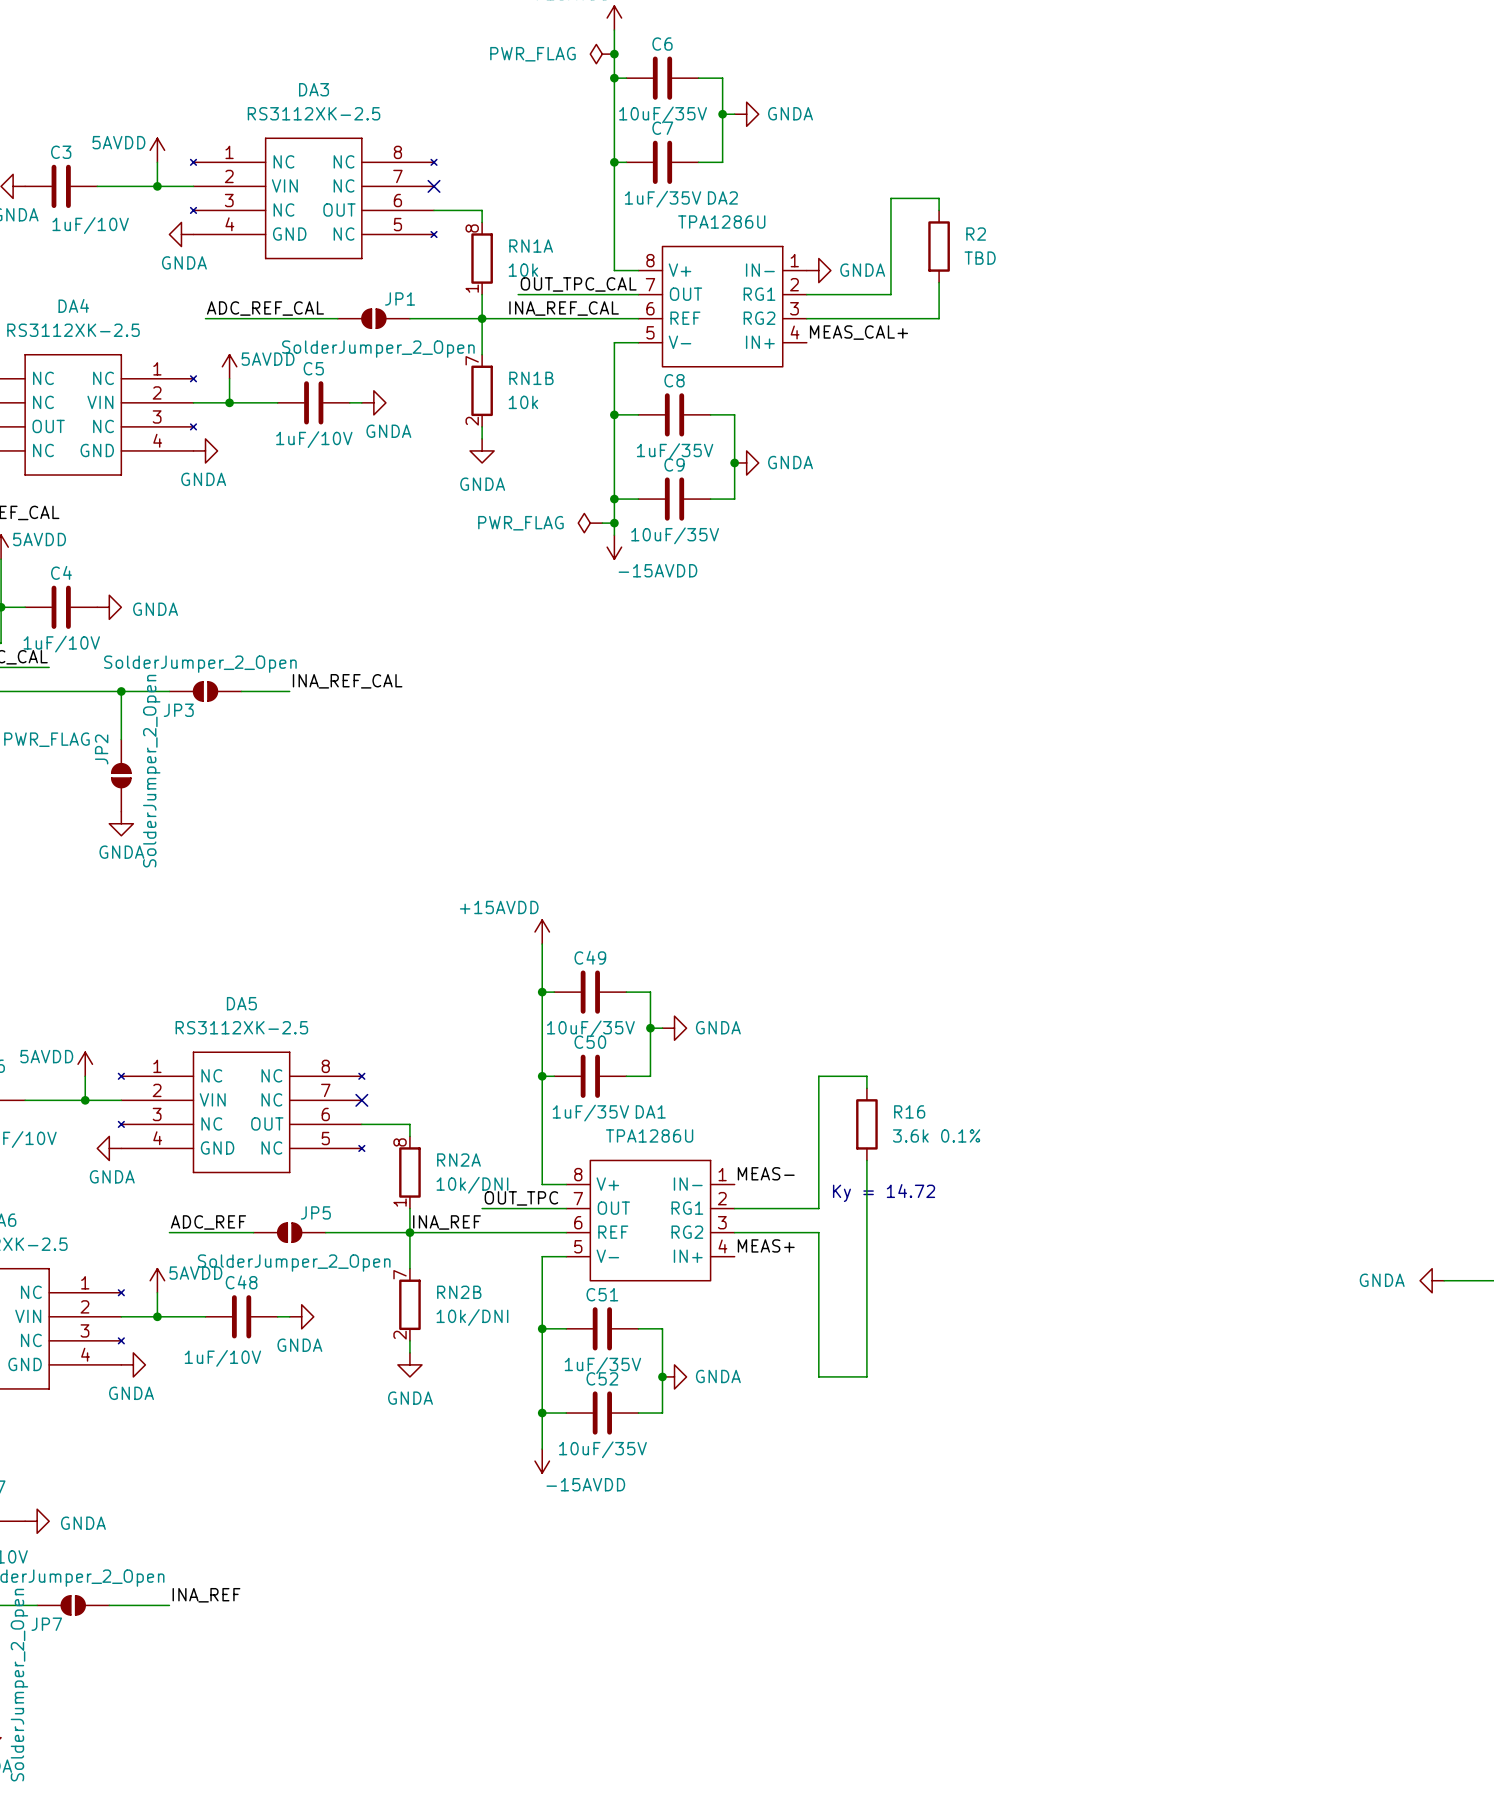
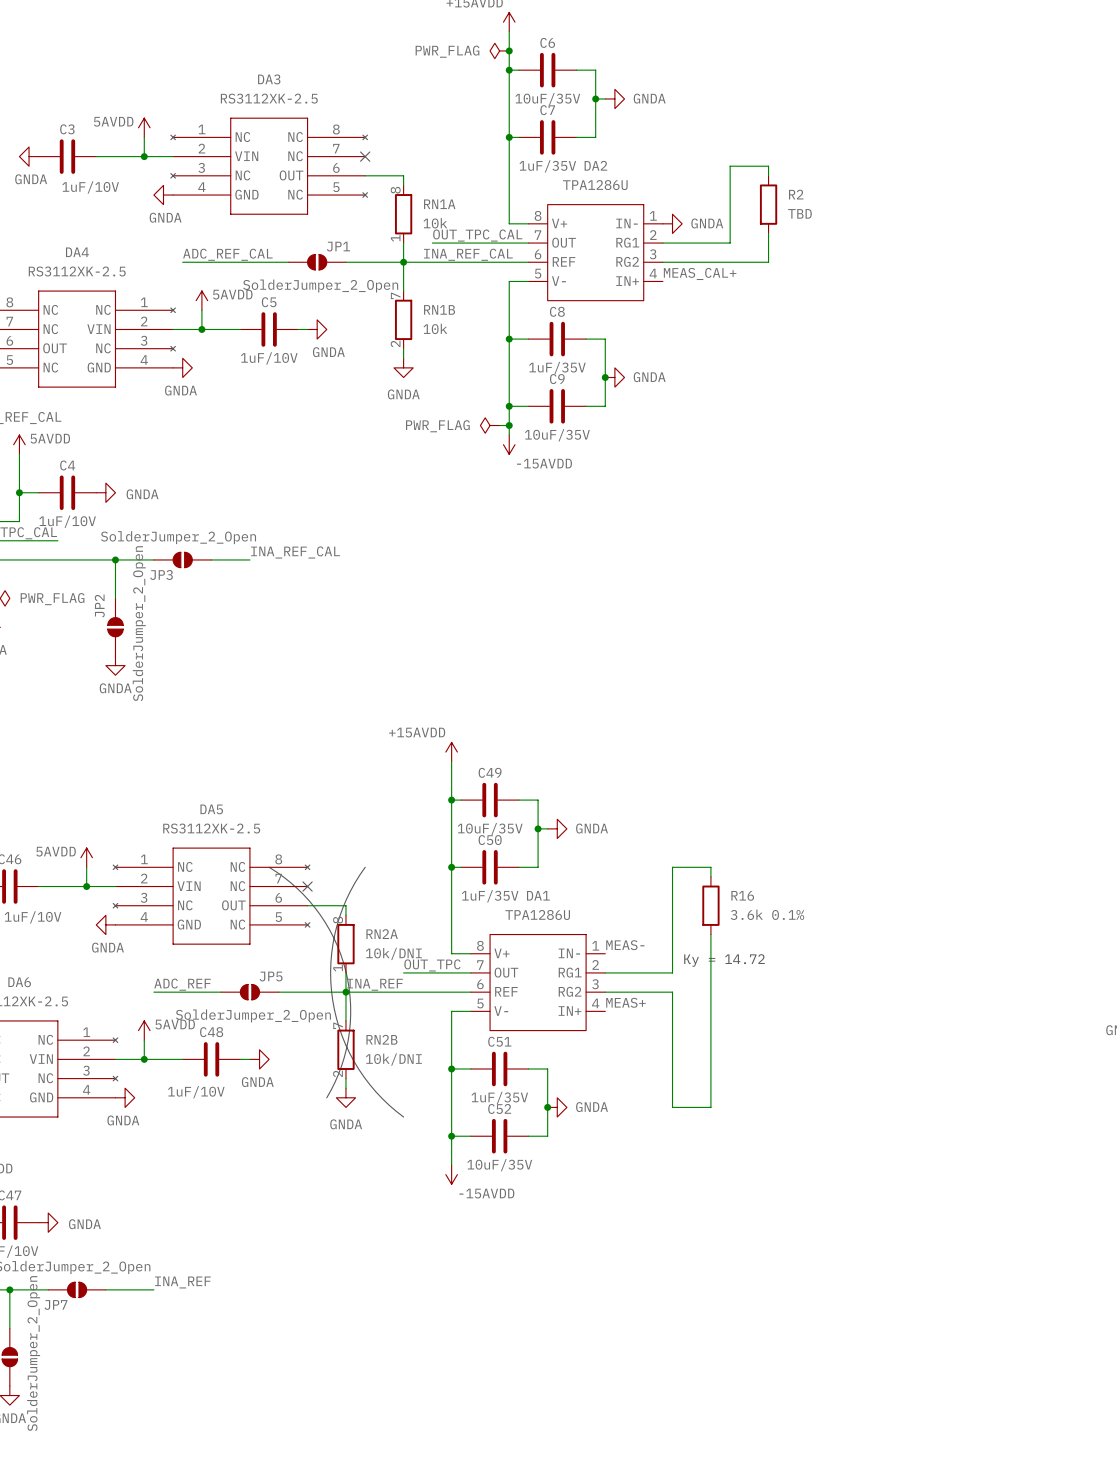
line: none -> (269, 867) (290, 882) (315, 907) (333, 937) (345, 970) (350, 1005) (349, 1031) (341, 1065) (326, 1097)
line: none -> (365, 867) (350, 891) (336, 925) (330, 962) (332, 1000) (342, 1036) (354, 1061) (375, 1091) (403, 1117)

